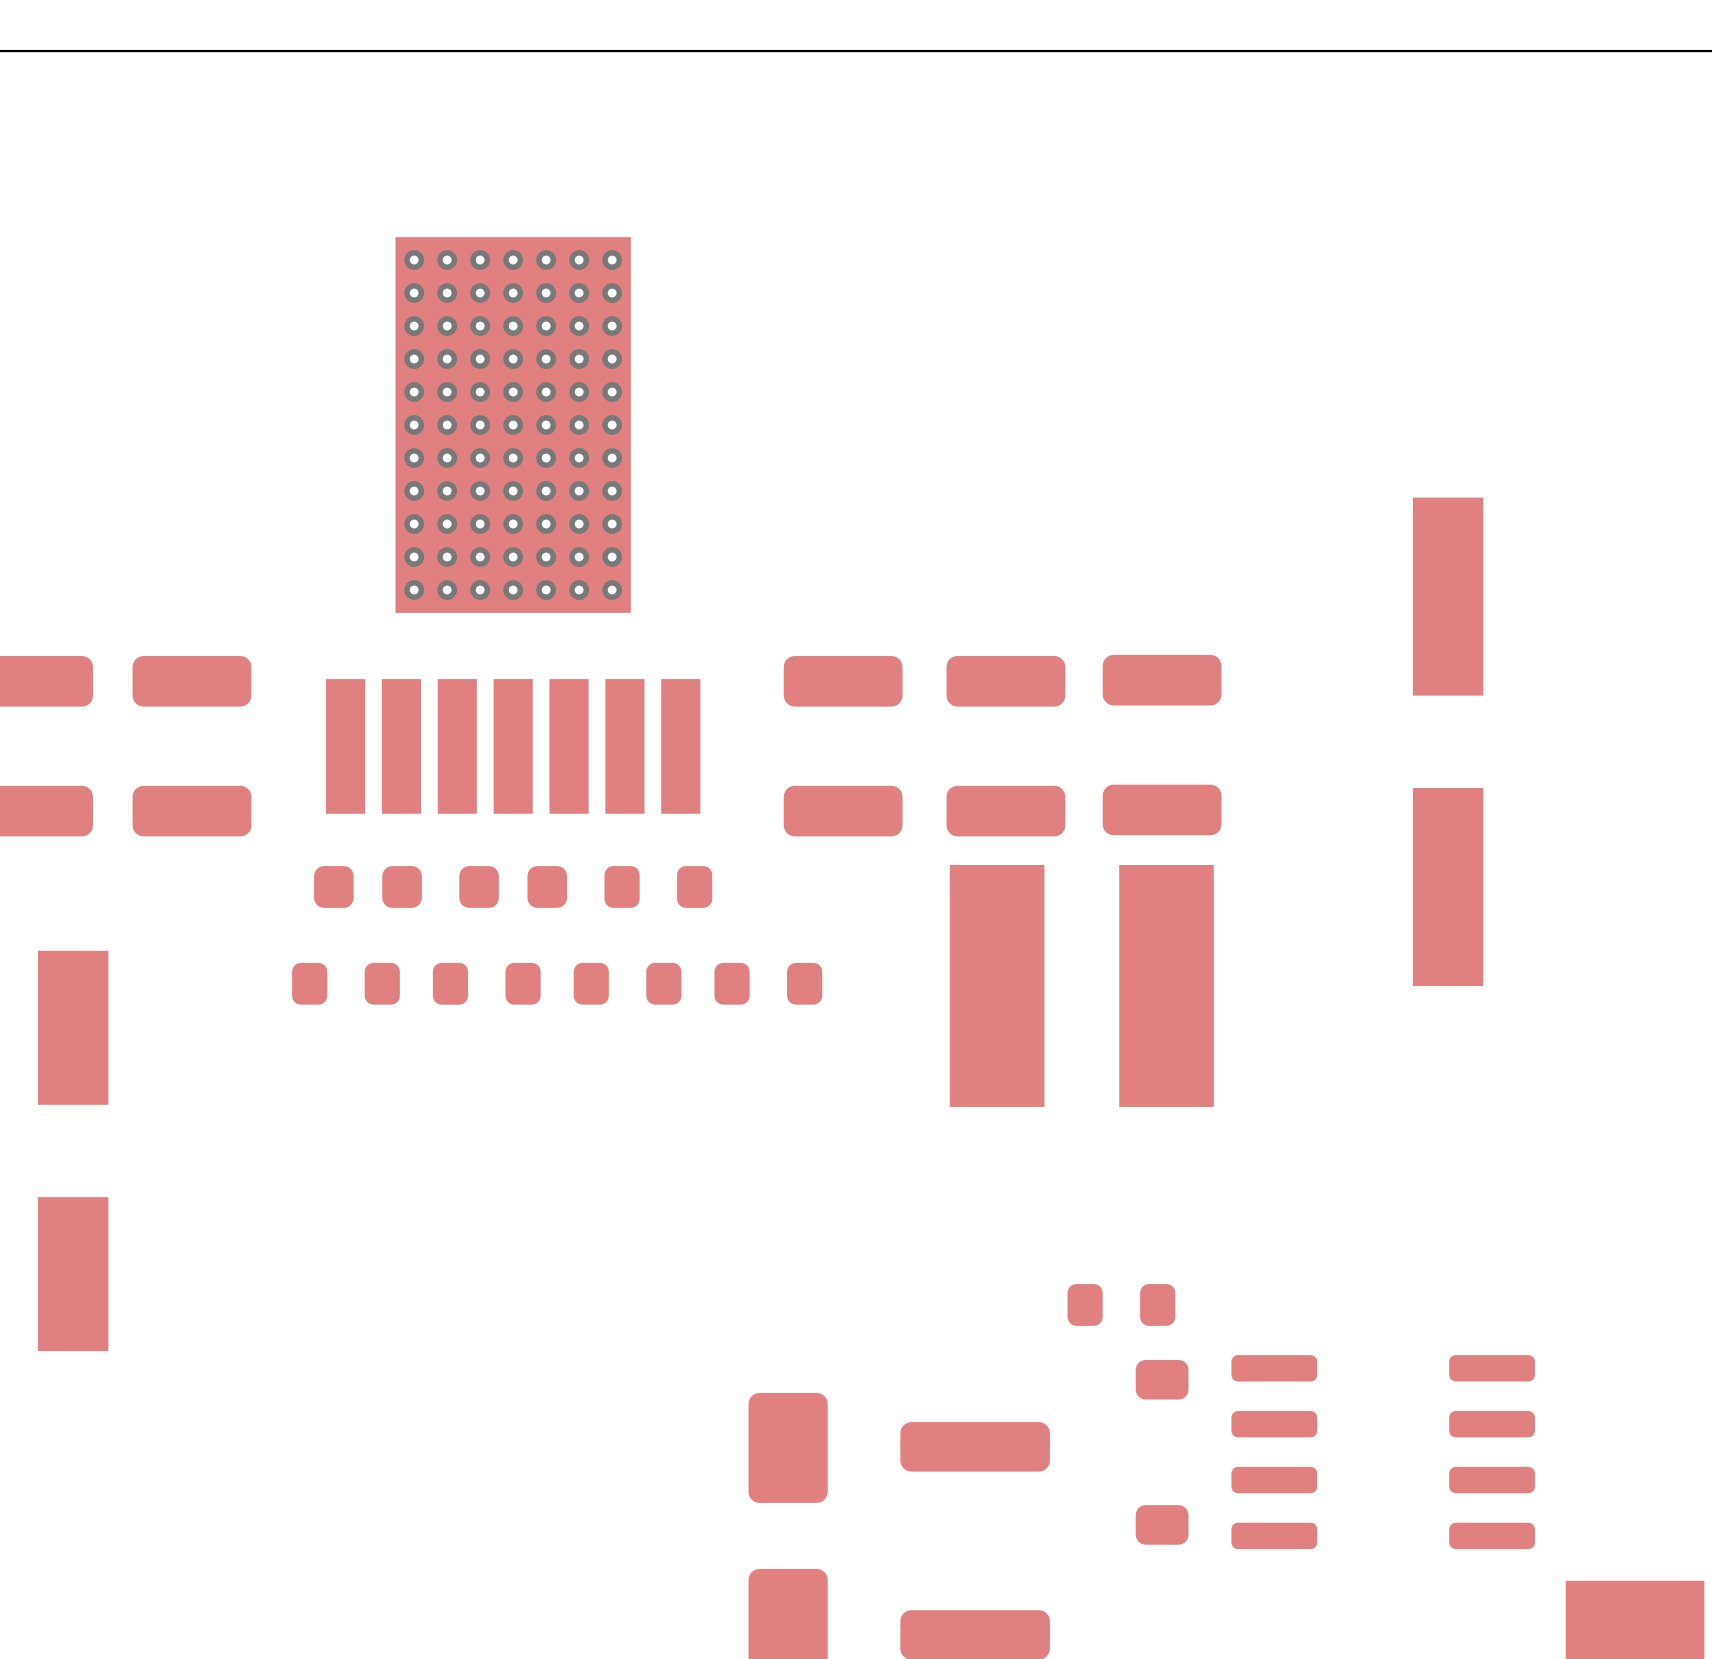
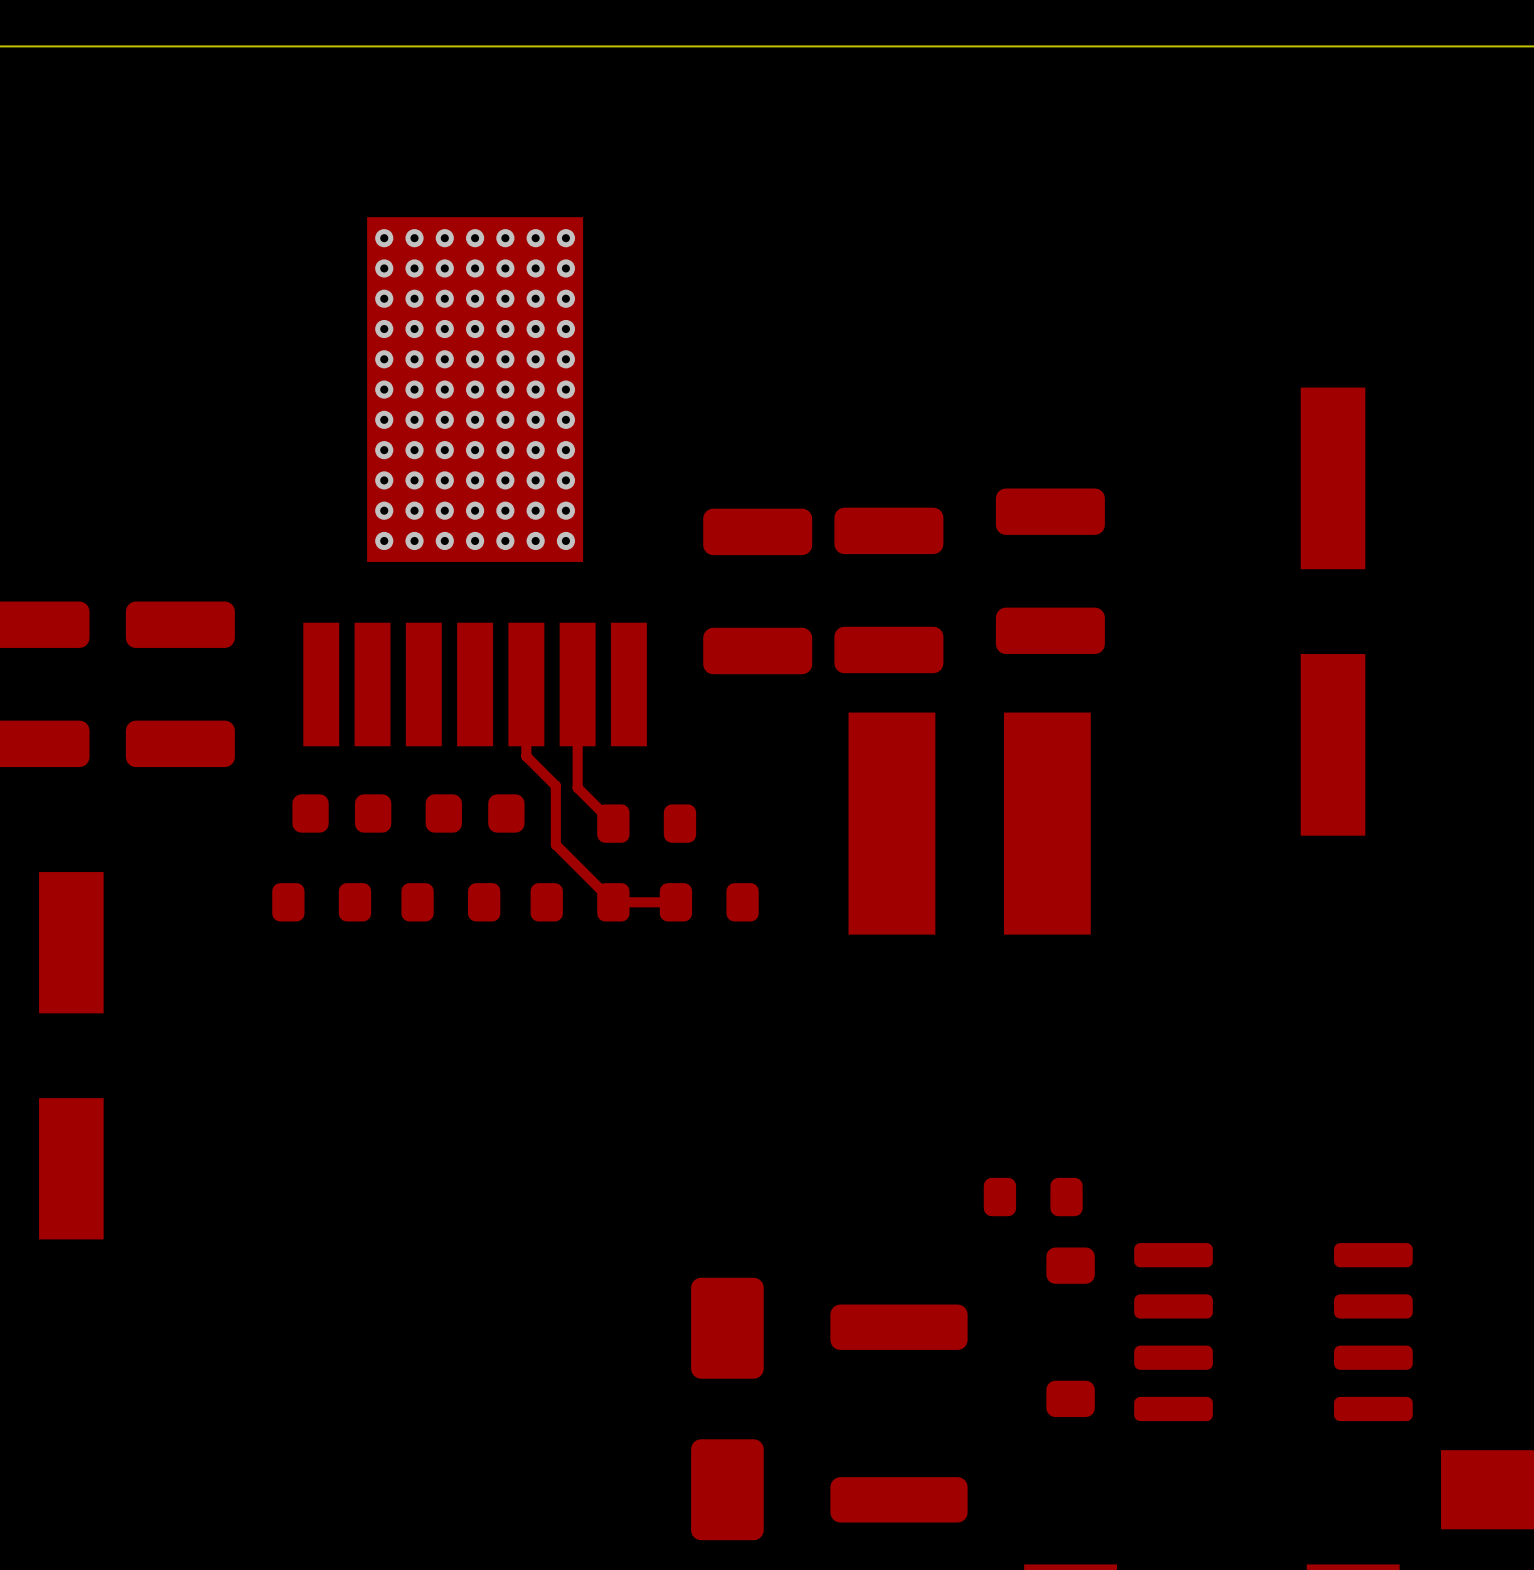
part: none -> (1050, 571)
part: none -> (888, 590)
part: none -> (757, 591)
part position: (1448, 741) -> (1333, 611)
part: (1162, 745) -> none
top track: none -> (526, 684) (526, 756) (555, 785) (555, 844) (613, 902) (675, 902)
top track: none -> (577, 684) (577, 787) (613, 823)
part: (843, 746) -> none
part: (1005, 746) -> none
part position: (658, 886) -> (646, 823)
part position: (1081, 985) -> (969, 823)

